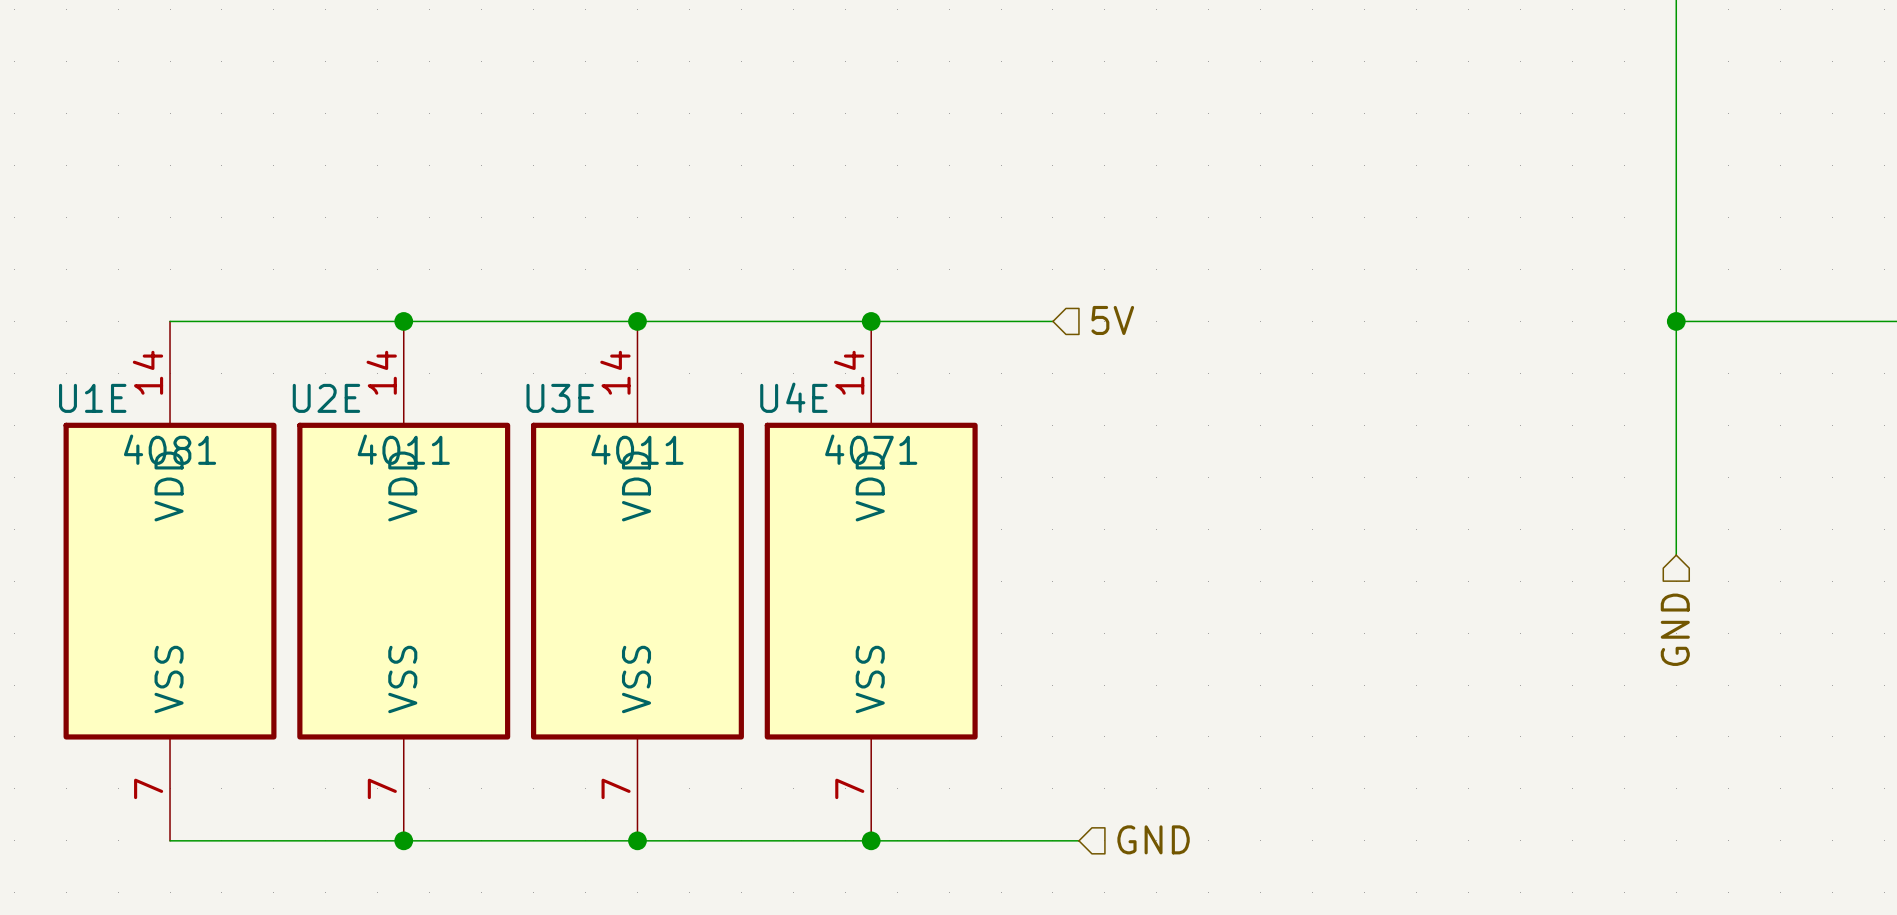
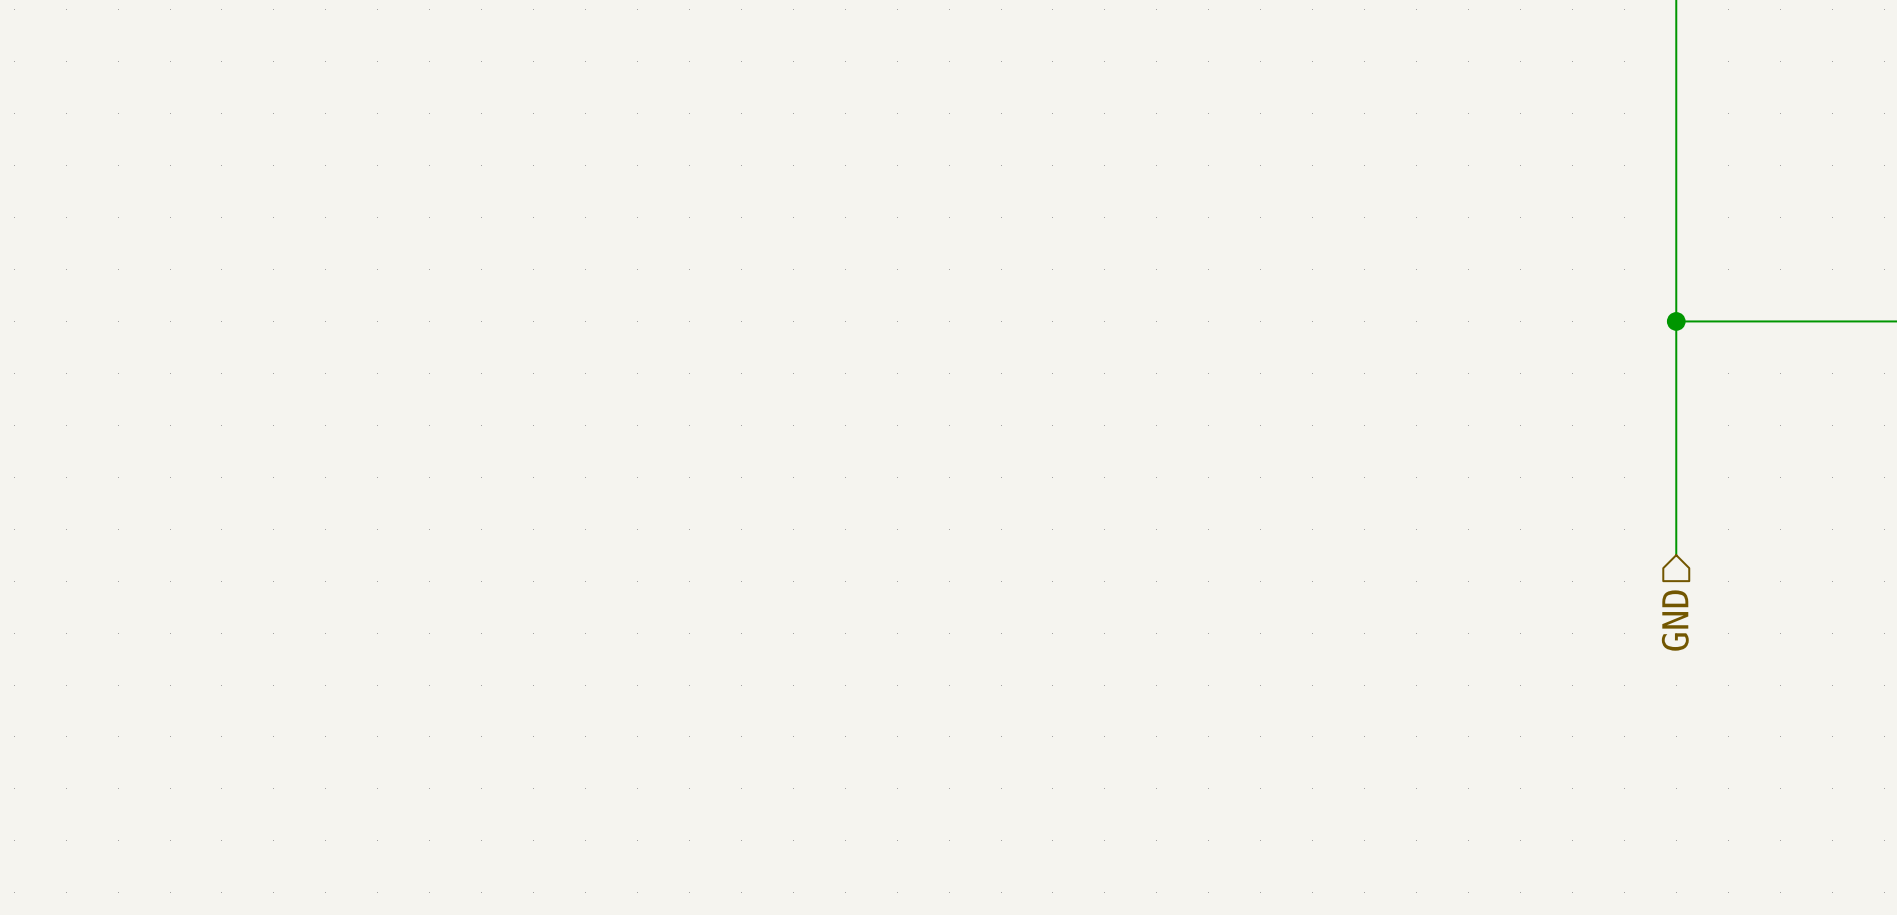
hierarchical label: 5V (1112, 320) -> none
wire: (170, 321) (1052, 321) -> none
junction: (403, 321) -> none
junction: (637, 321) -> none
junction: (871, 321) -> none
U1E: 4081 (170, 581) -> none
U2E: 4011 (403, 581) -> none
U3E: 4011 (637, 581) -> none
U4E: 4071 (871, 581) -> none
hierarchical label: GND (1153, 839) -> none
wire: (170, 840) (1078, 840) -> none
junction: (403, 840) -> none
junction: (637, 840) -> none
junction: (871, 840) -> none

